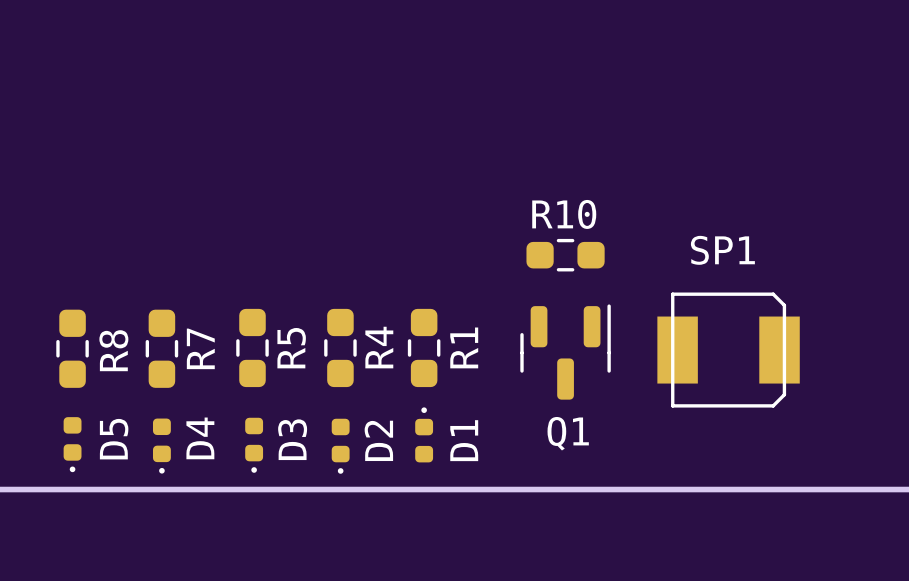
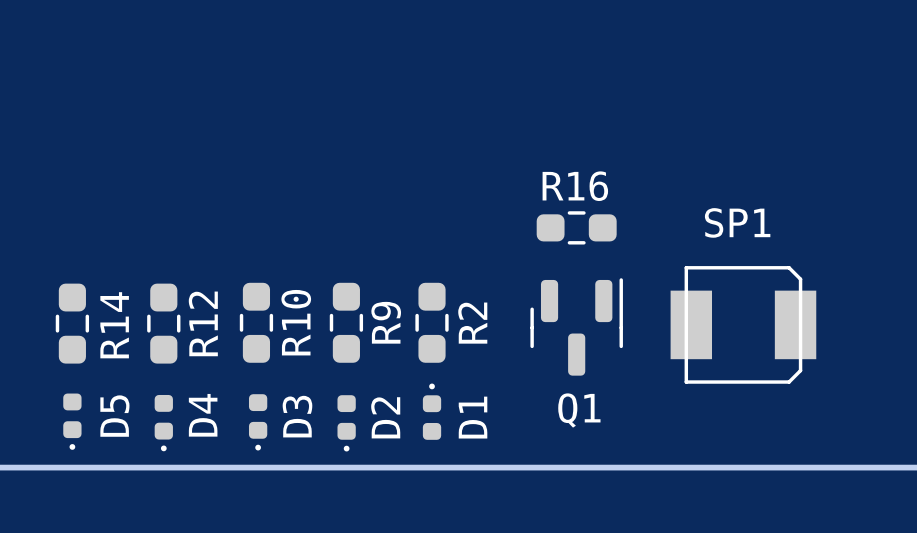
R10 name: R10 (564, 214) -> R16 (575, 186)
R4 name: R4 (379, 347) -> R9 (386, 322)
R1 name: R1 (464, 347) -> R2 (472, 323)
R7 name: R7 (200, 348) -> R12 (203, 323)
R5 name: R5 (291, 348) -> R10 (296, 322)
R8 name: R8 (113, 350) -> R14 (114, 325)

